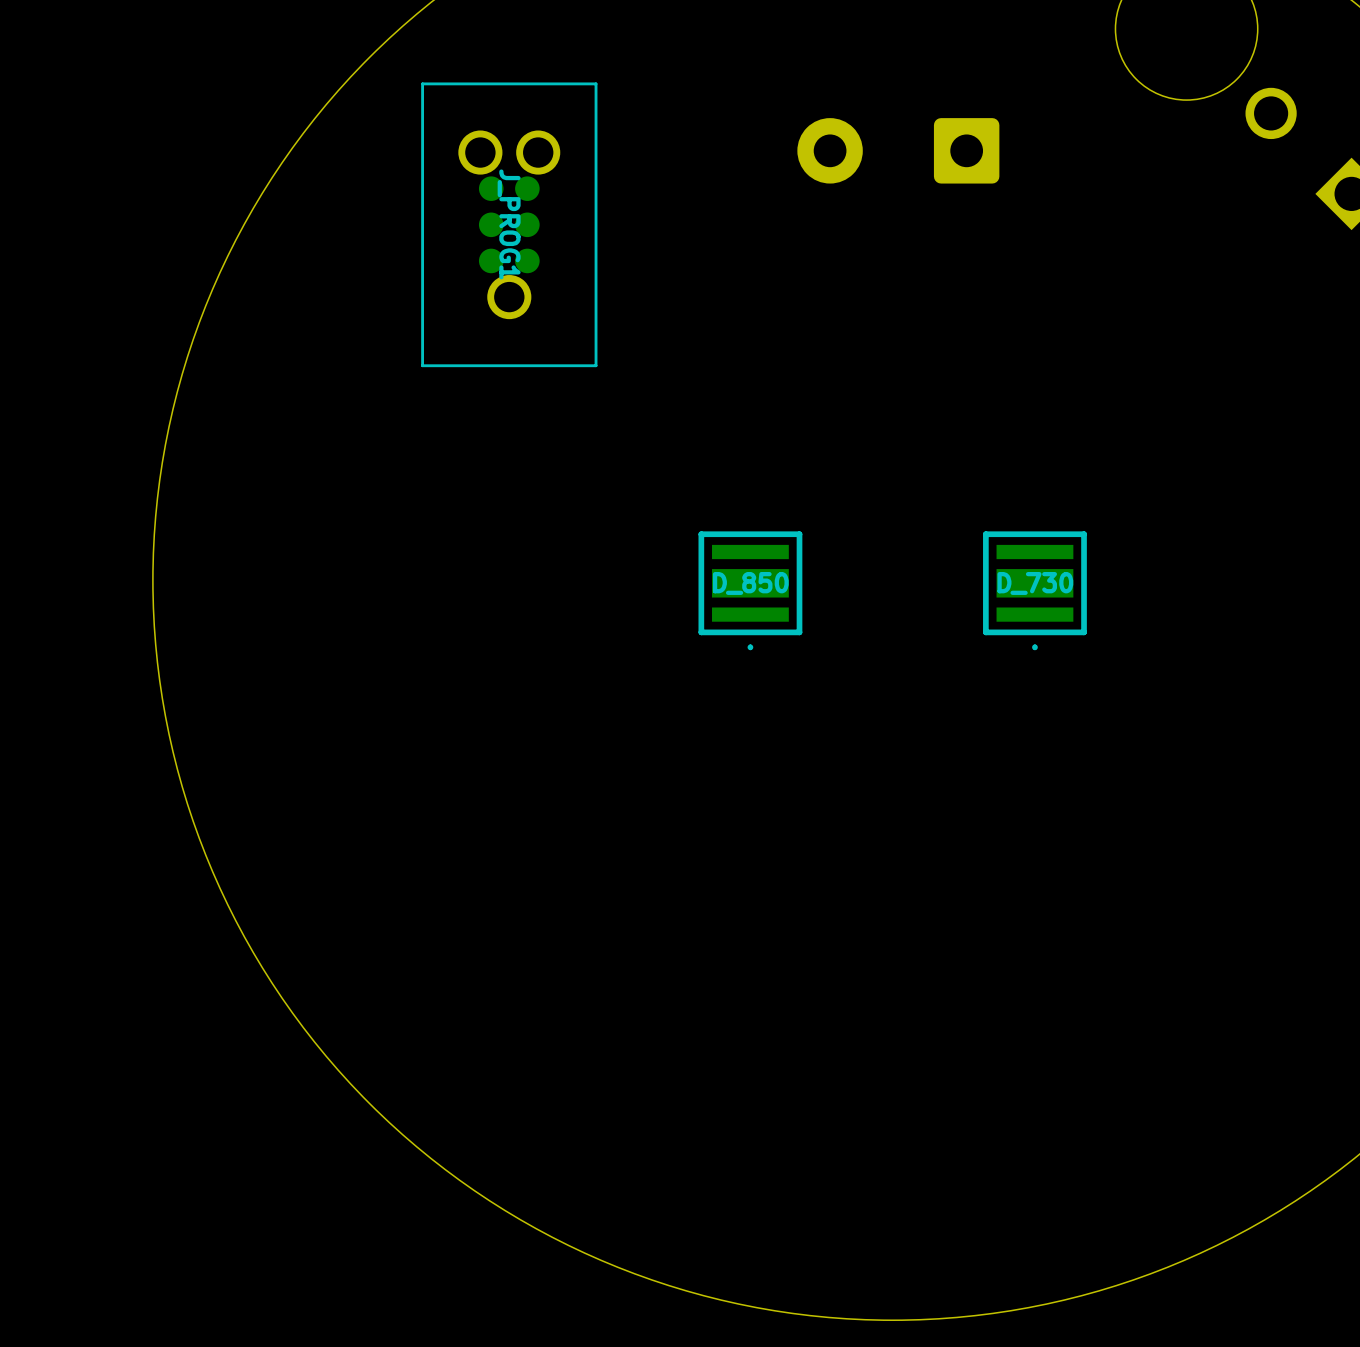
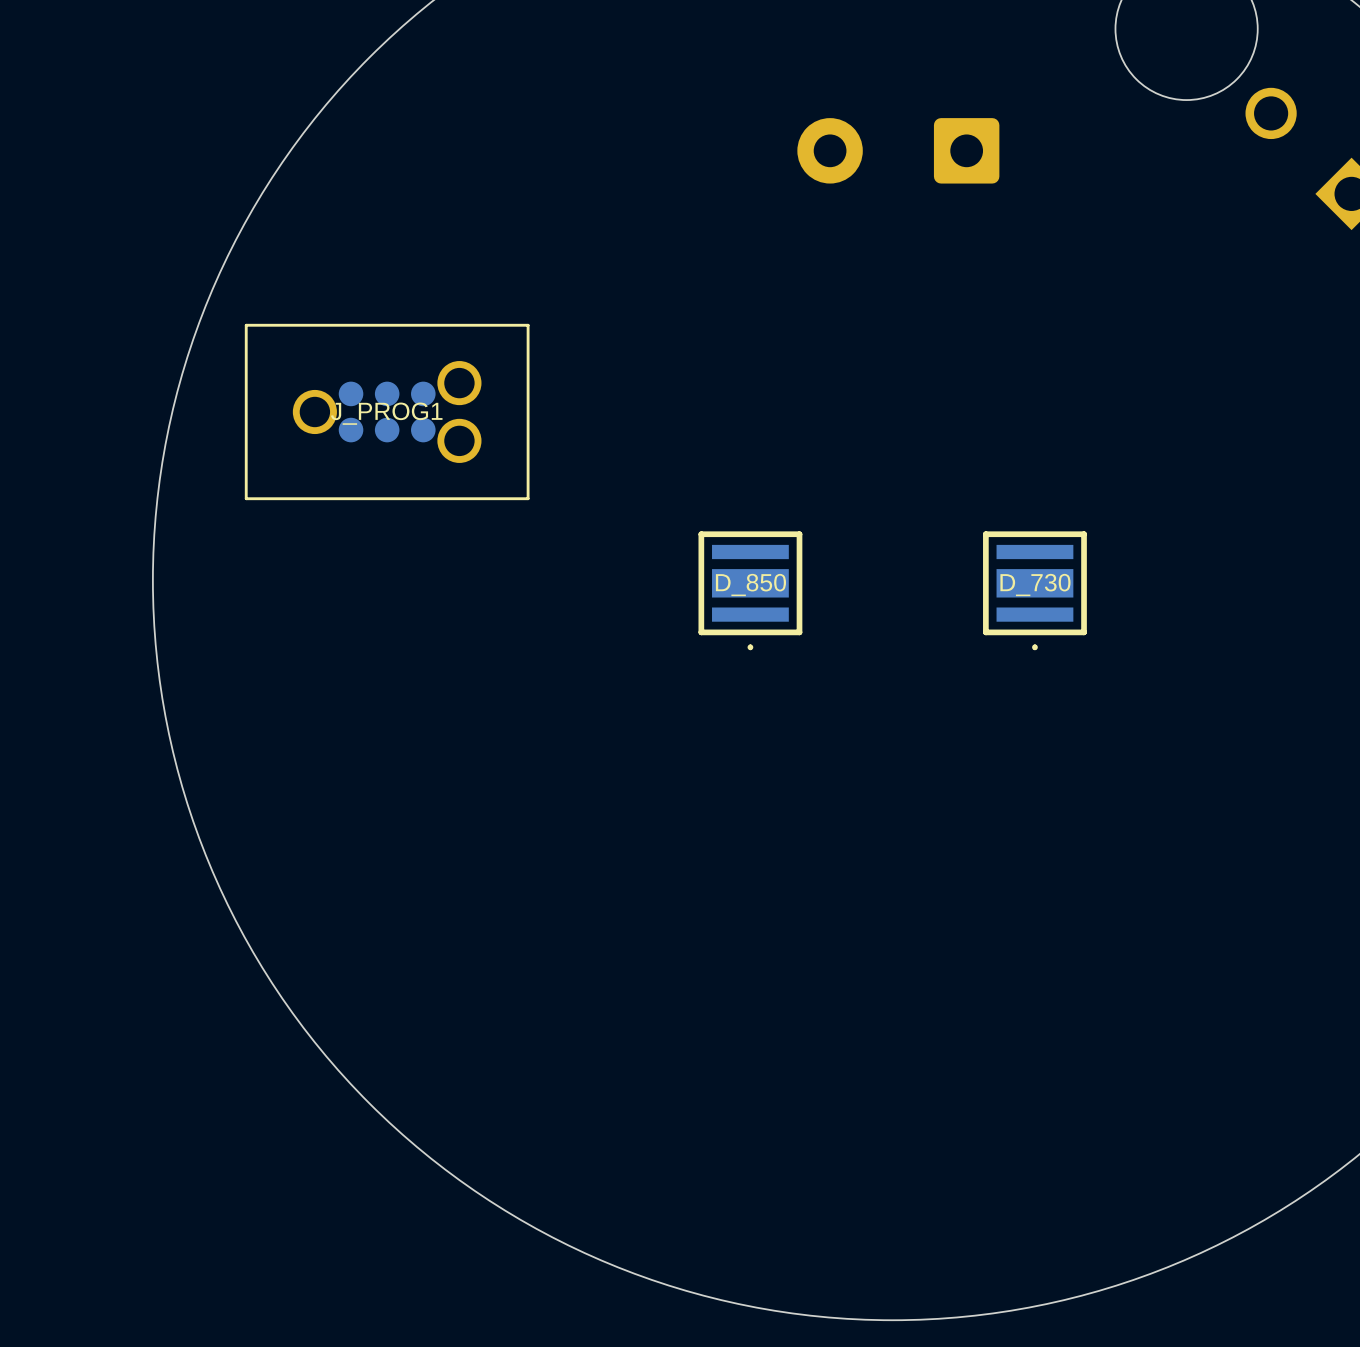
J_PROG1 rotation: 0° (509, 224) -> 90° clockwise (387, 411)
J_PROG1 position: (509, 224) -> (387, 411)

